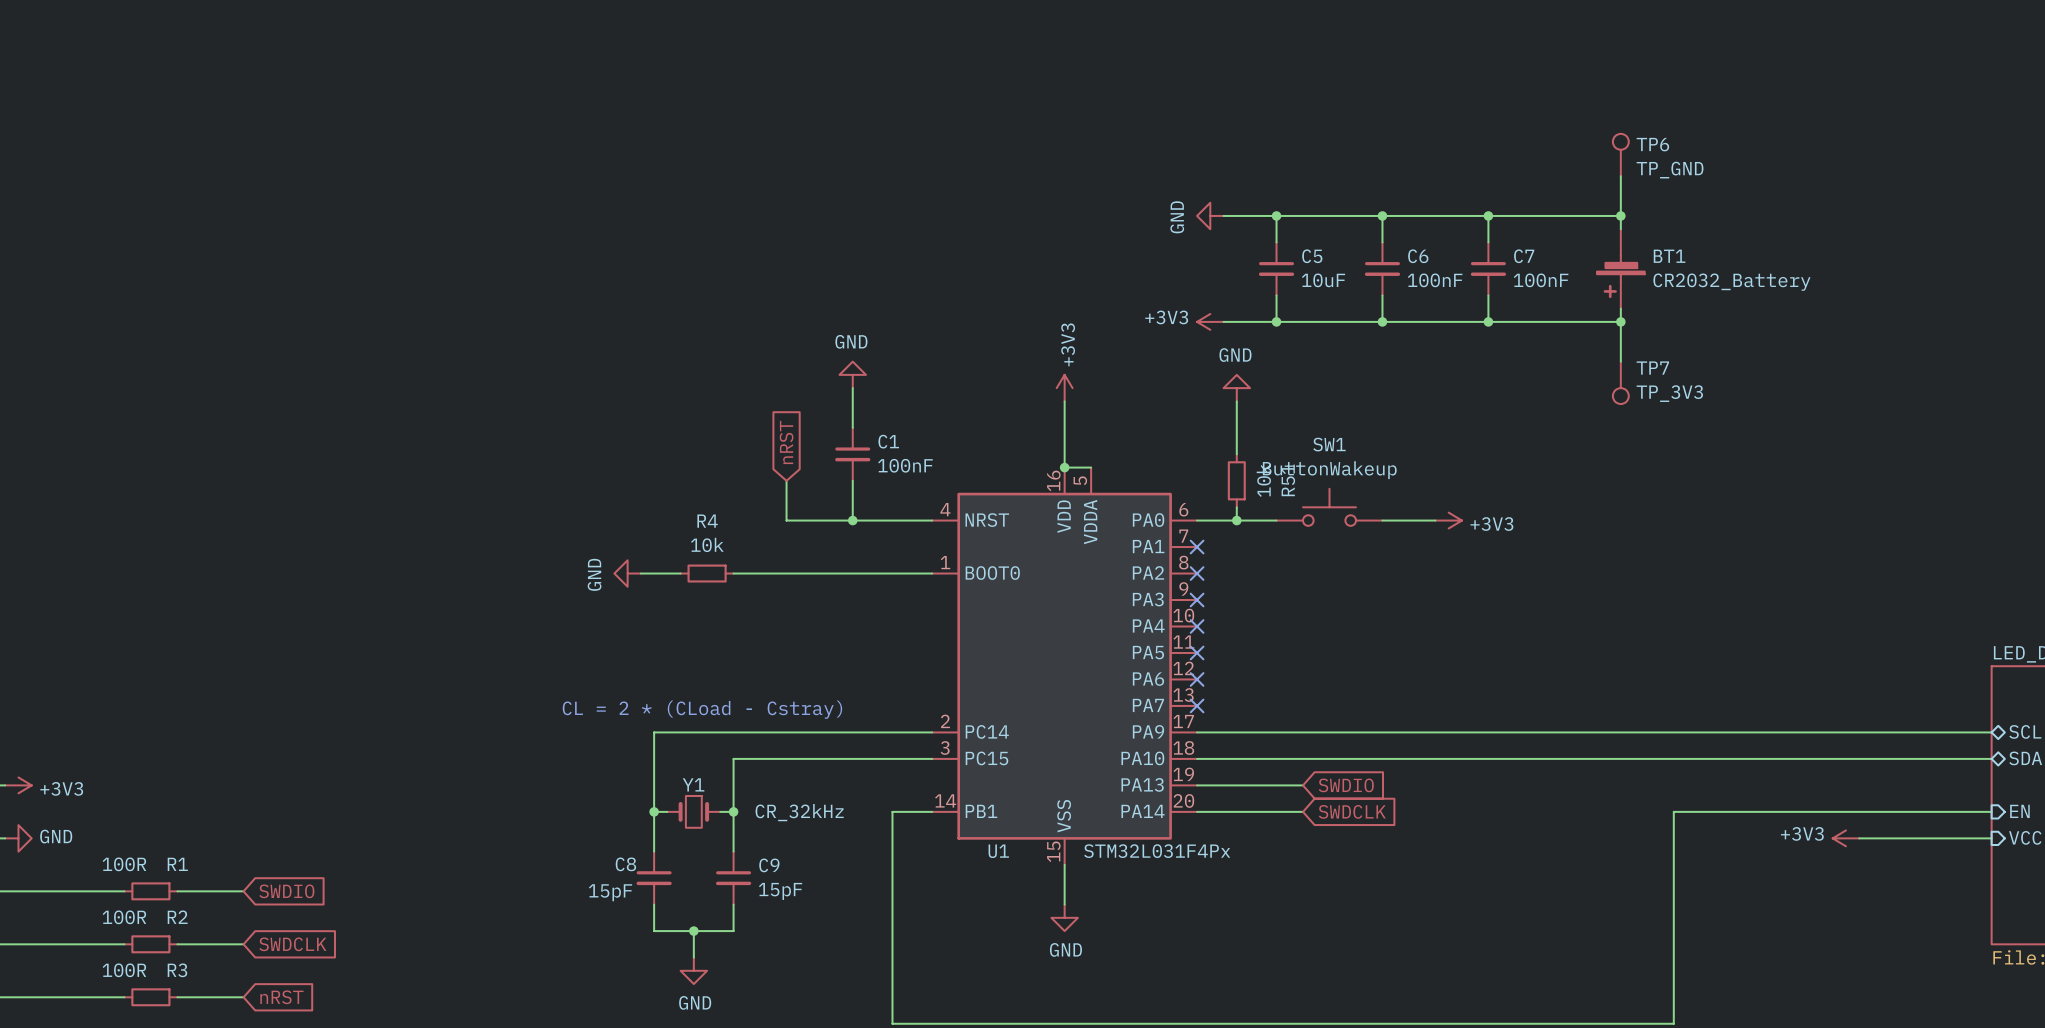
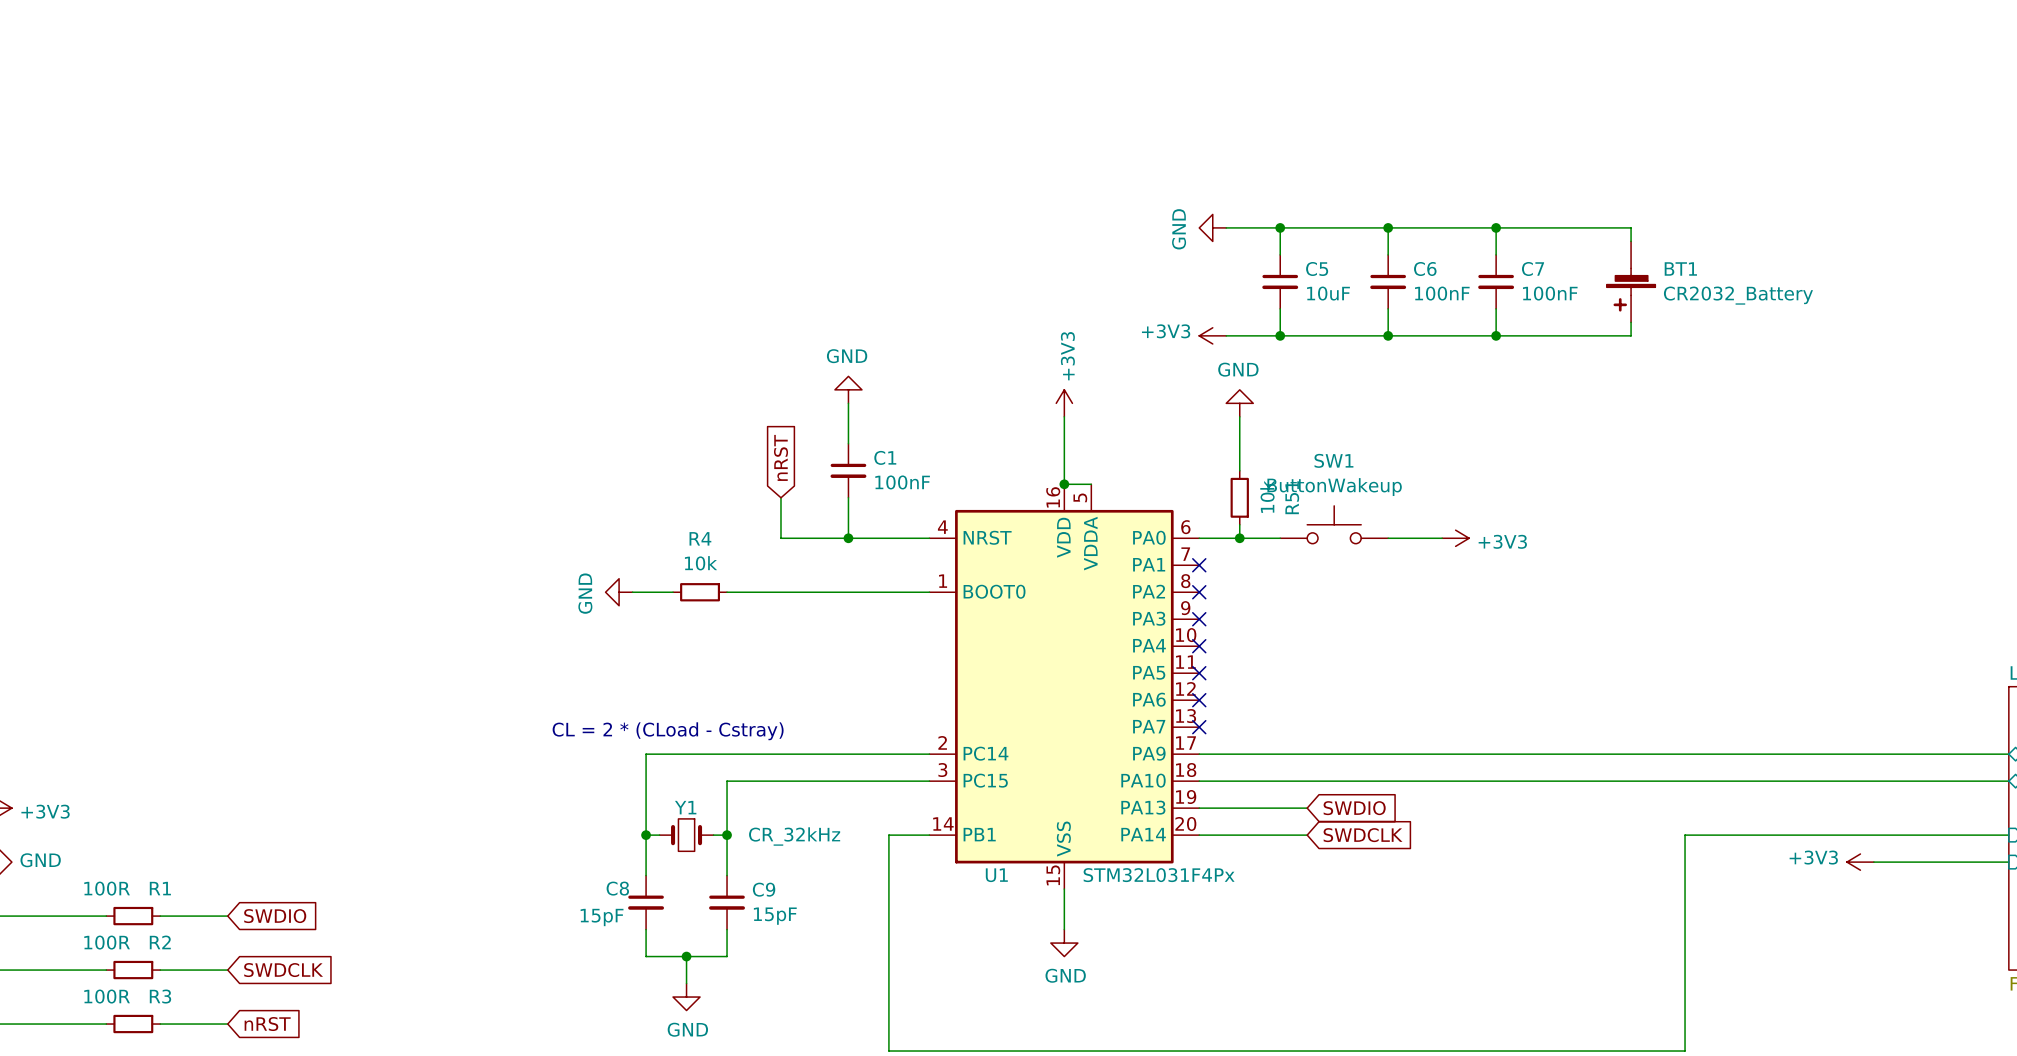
TP6: TP_GND (1620, 155) -> none
wire: (1620, 176) (1620, 215) -> none
junction: (1620, 215) -> none
wire: (1620, 321) (1620, 361) -> none
junction: (1620, 321) -> none
TP7: TP_3V3 (1620, 382) -> none

